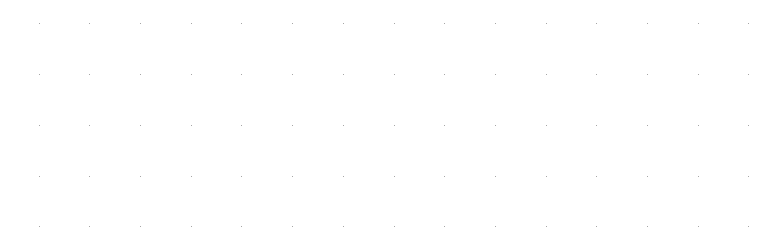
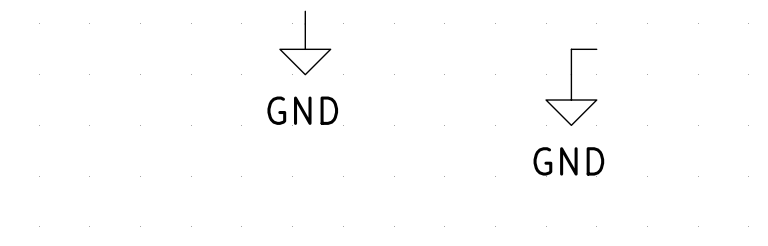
wire: none -> (305, 11) (305, 23)
power symbol: none -> GND (305, 49)
wire: none -> (596, 49) (571, 49) (571, 74)
power symbol: none -> GND (571, 100)

